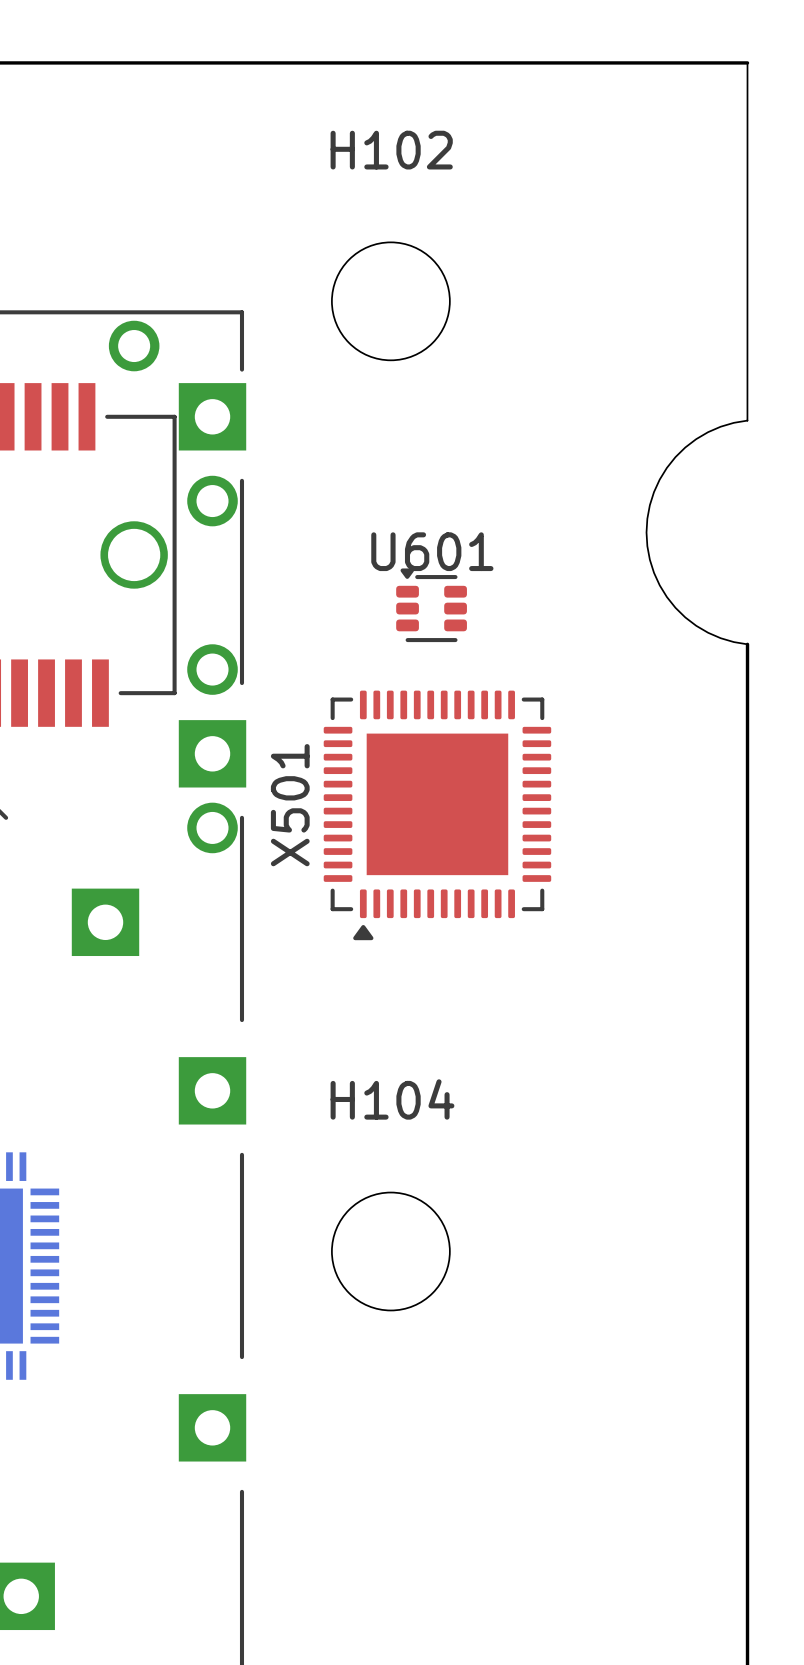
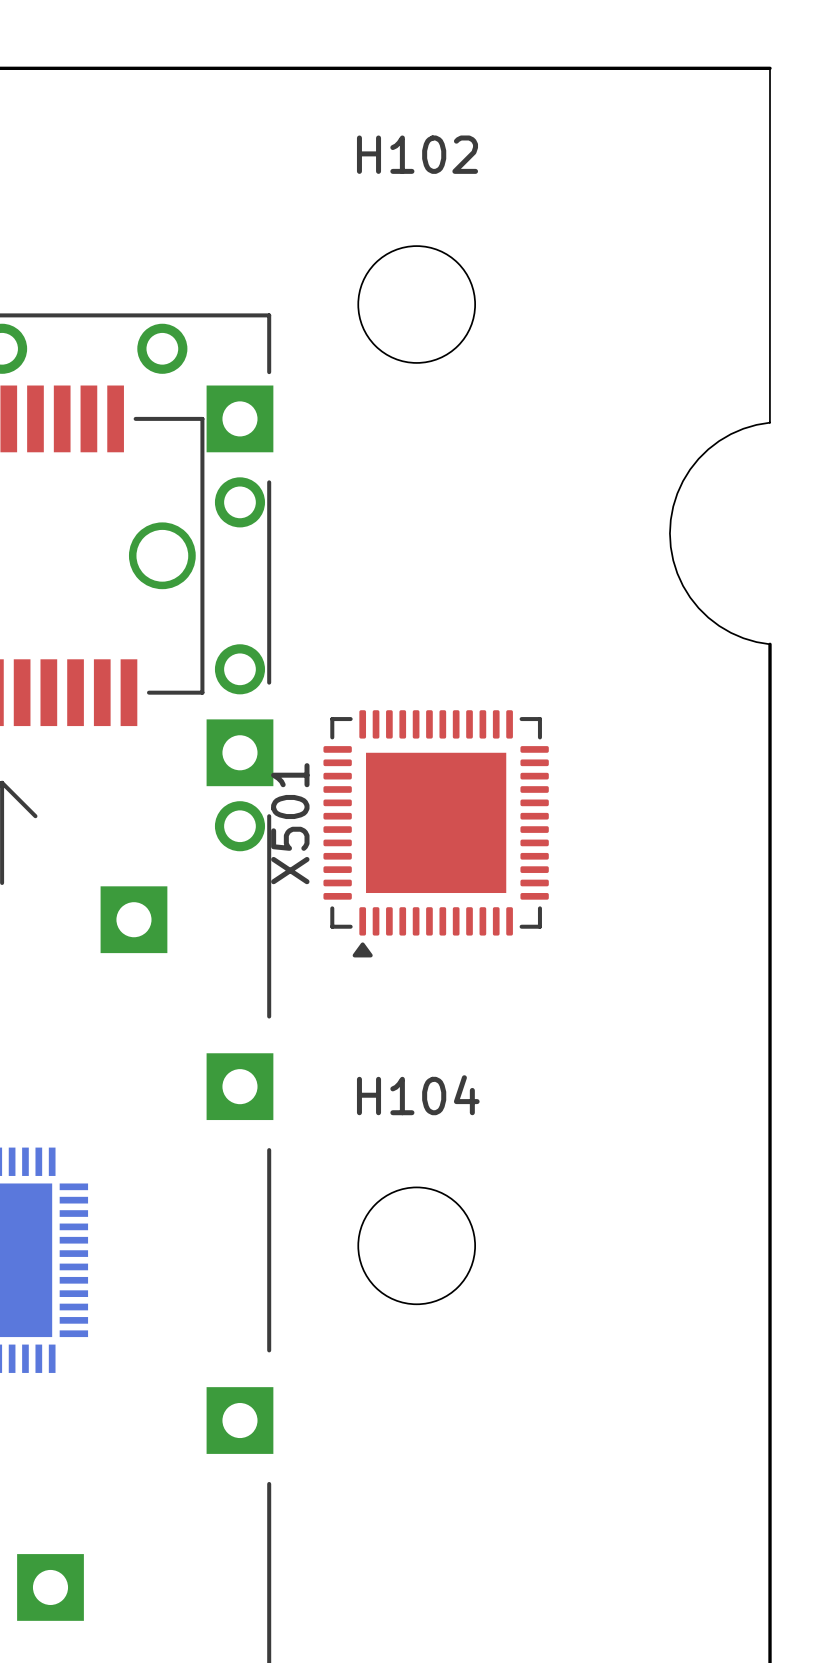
U601: (431, 605) -> none
X501 position: (437, 815) -> (436, 833)

